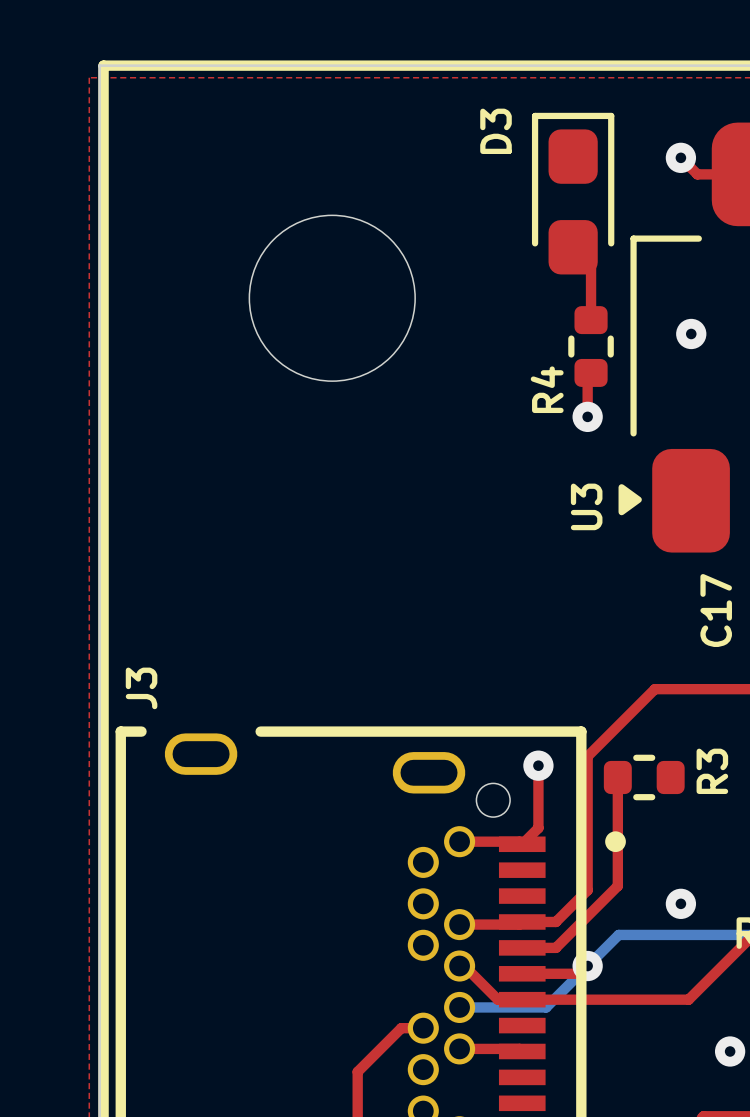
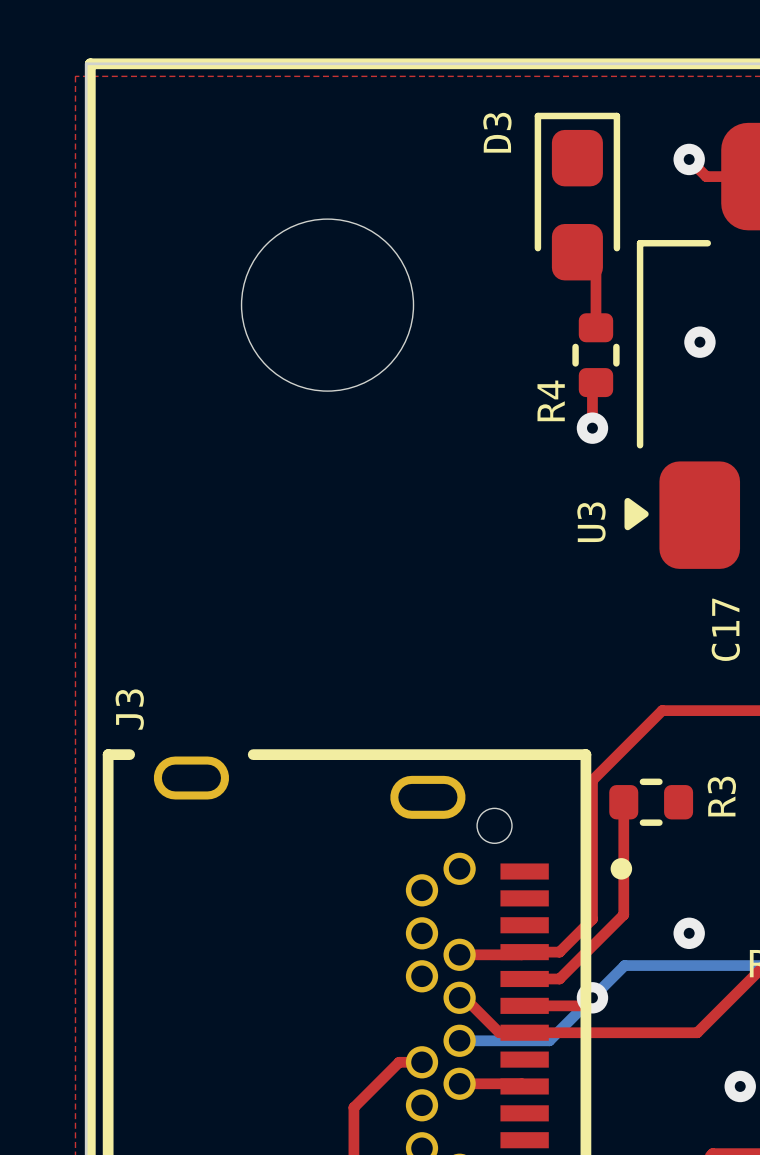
top track: (538, 765) (538, 828) (522, 844) (519, 841) (459, 841) -> none
via: (538, 765) -> none

